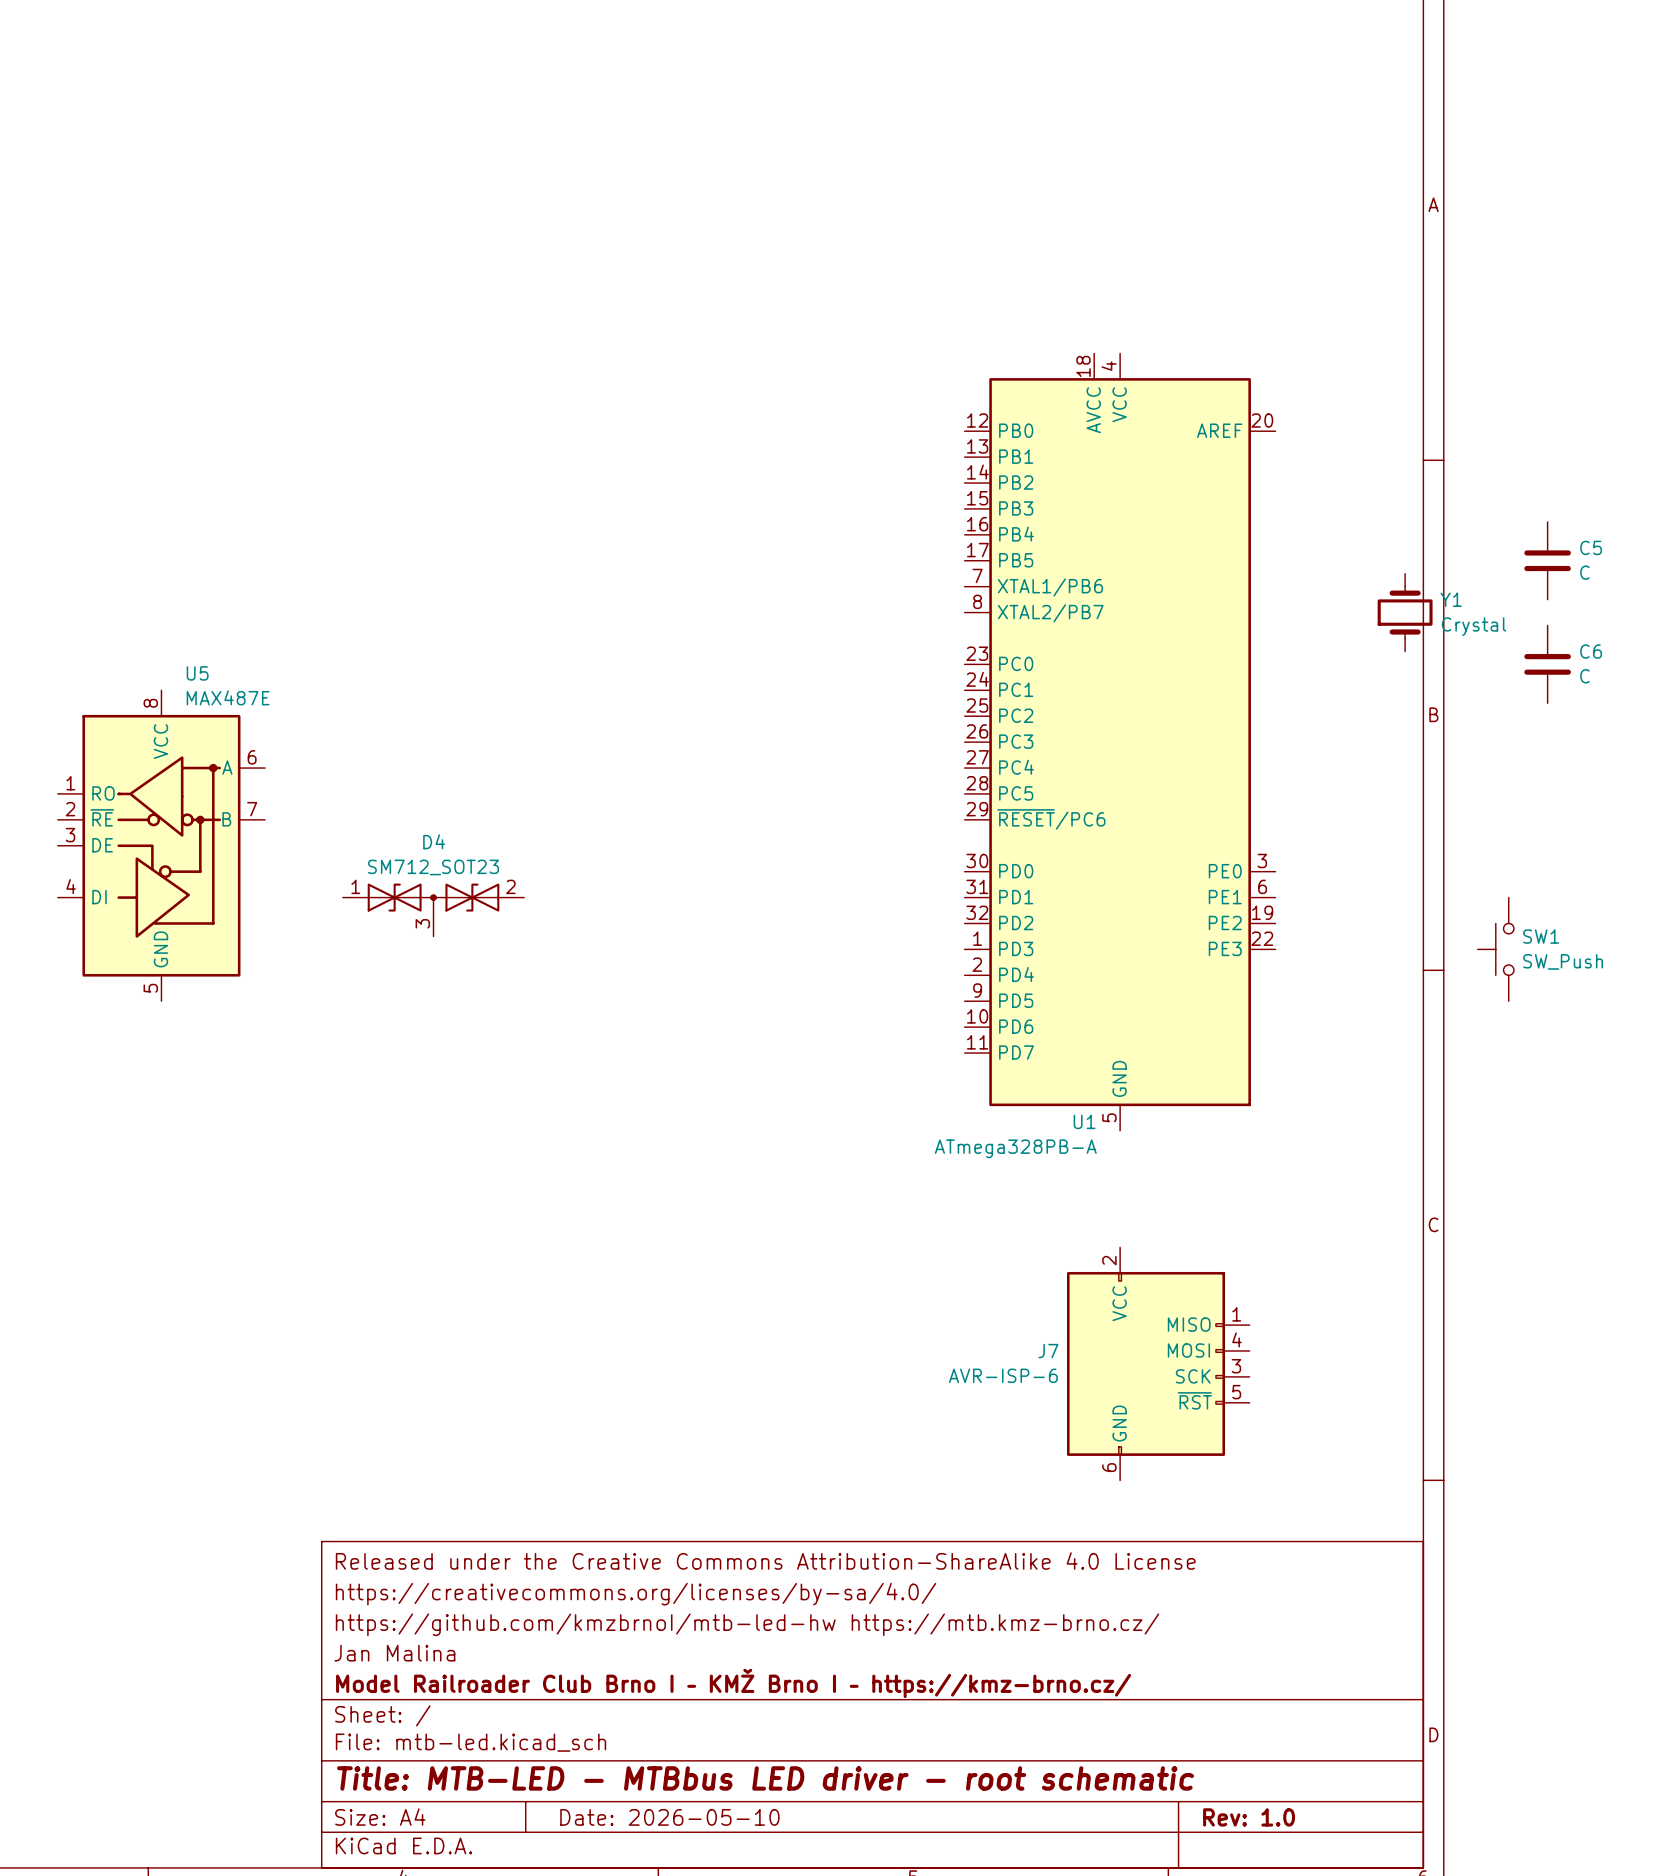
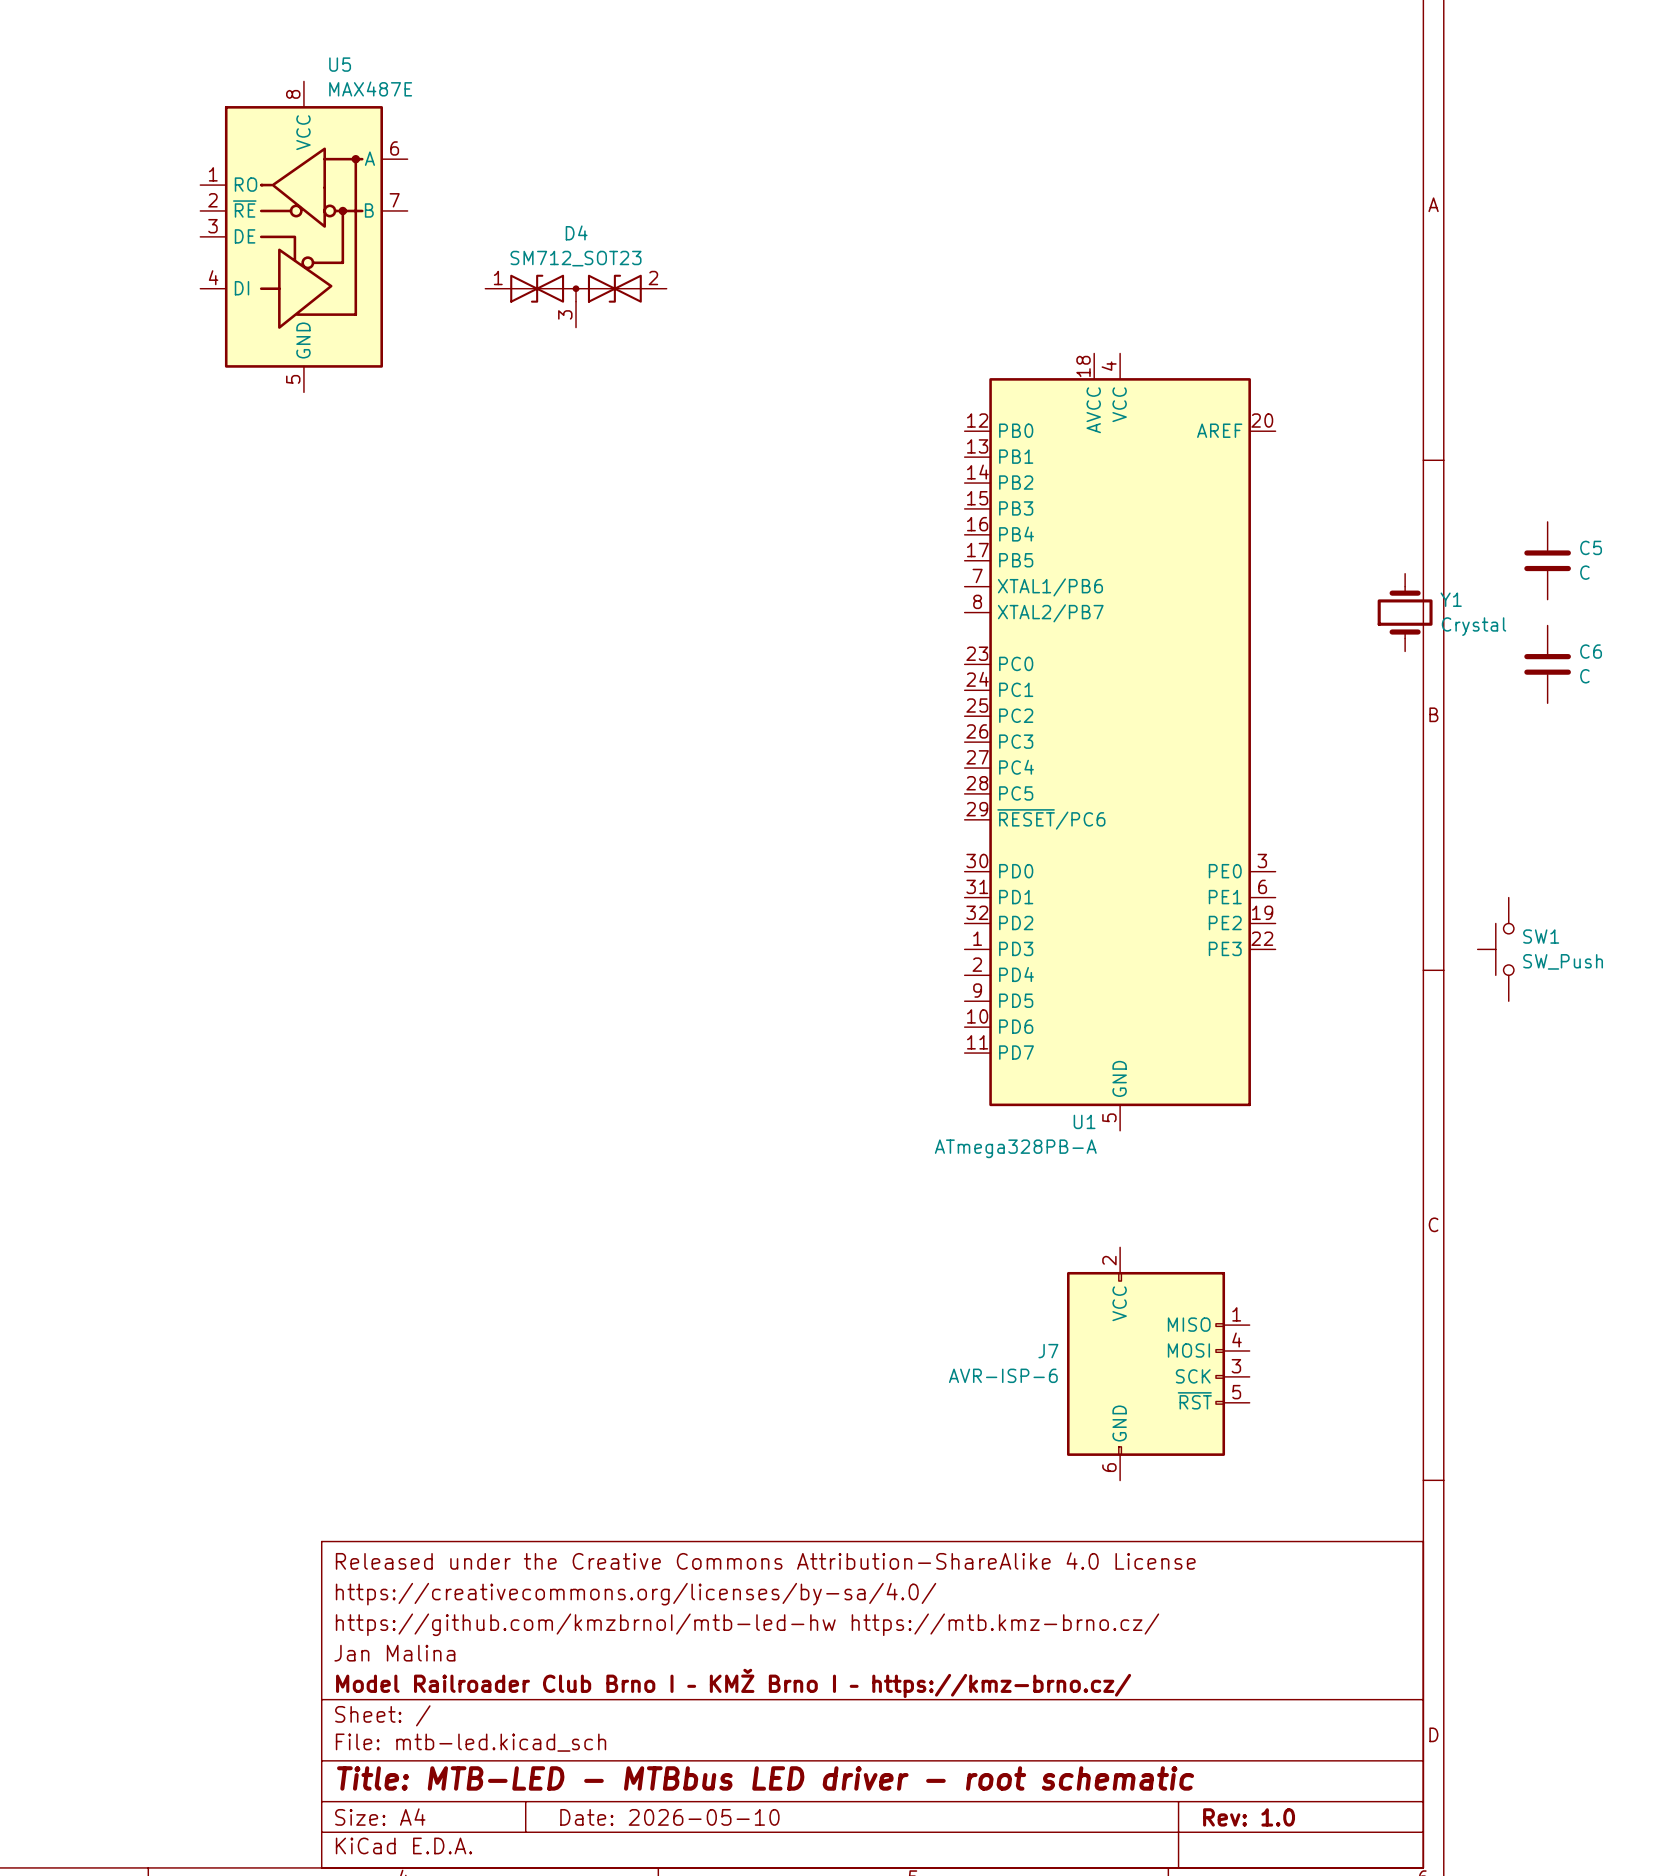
U5 position: (161, 845) -> (303, 236)
D4 position: (433, 910) -> (576, 301)

